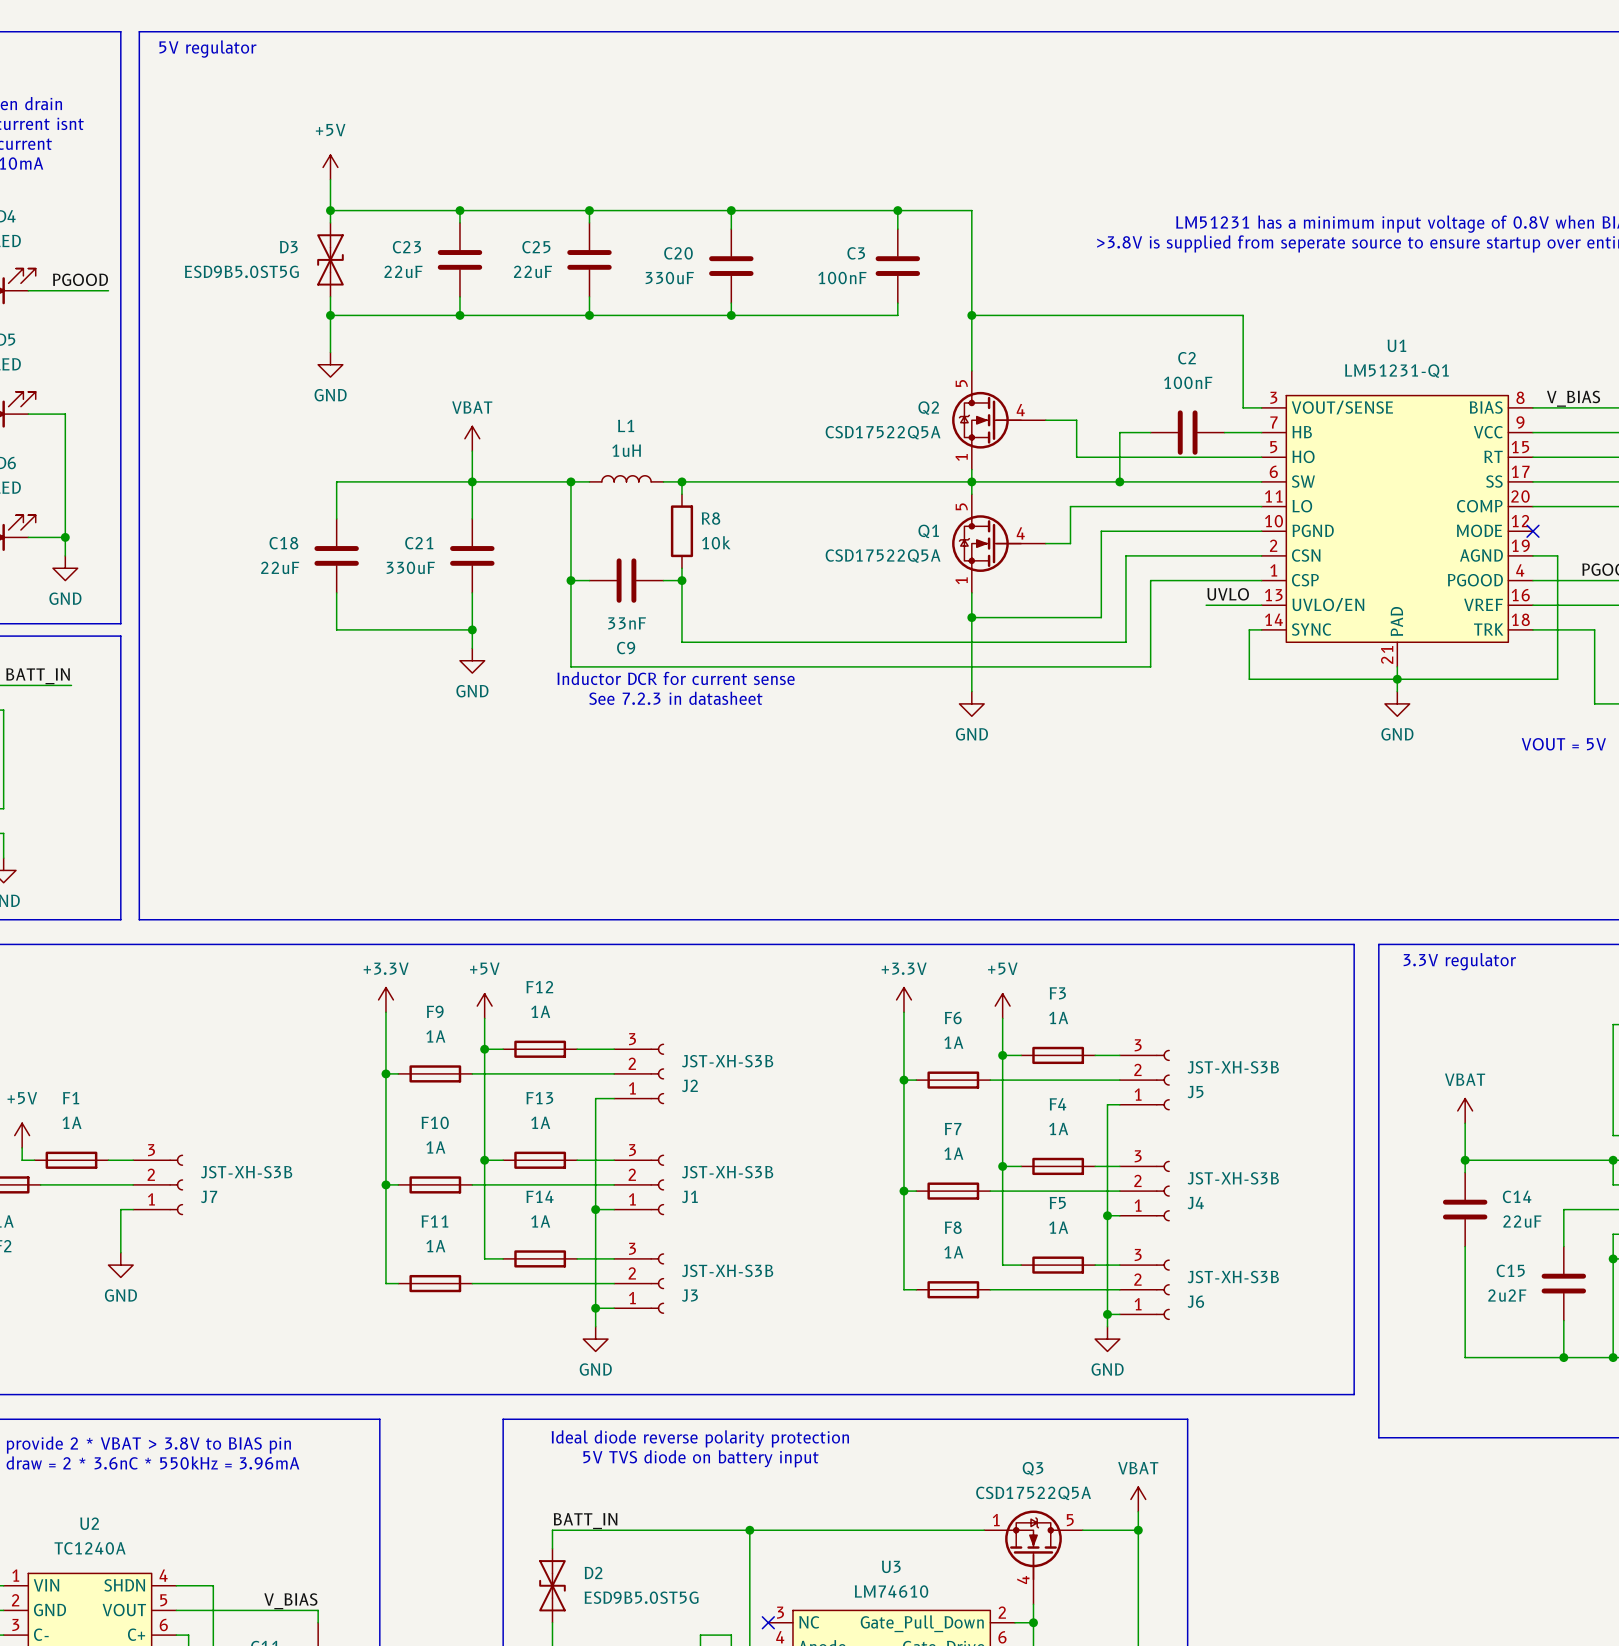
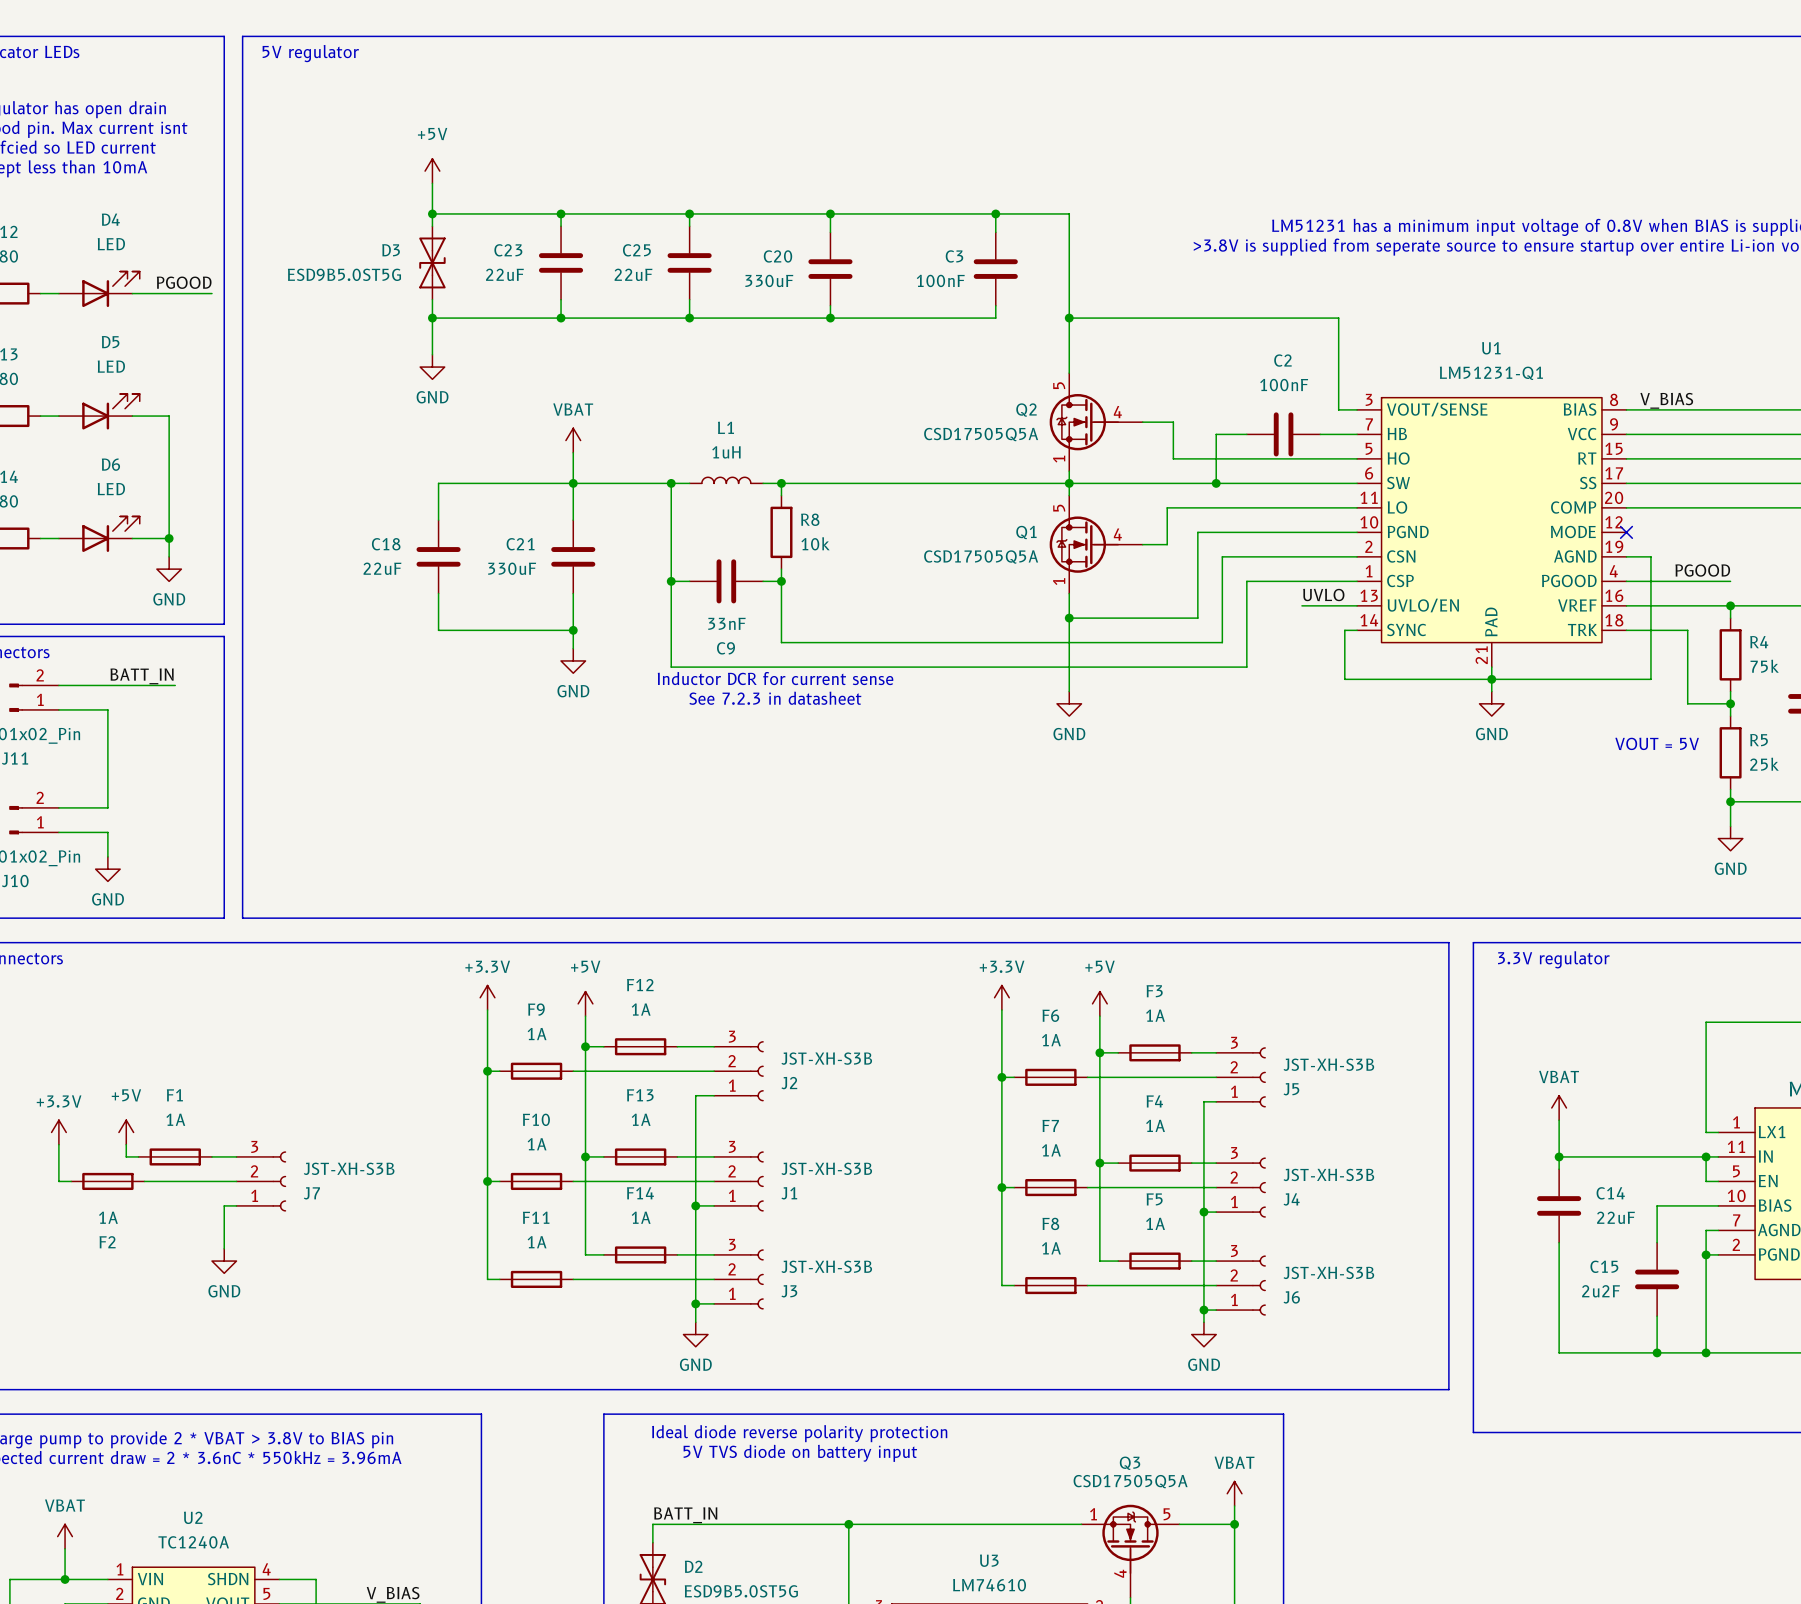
Q2 value: CSD17522Q5A (883, 432) -> CSD17505Q5A (981, 434)
Q1 value: CSD17522Q5A (883, 556) -> CSD17505Q5A (981, 557)
Q3 value: CSD17522Q5A (1033, 1493) -> CSD17505Q5A (1130, 1481)

